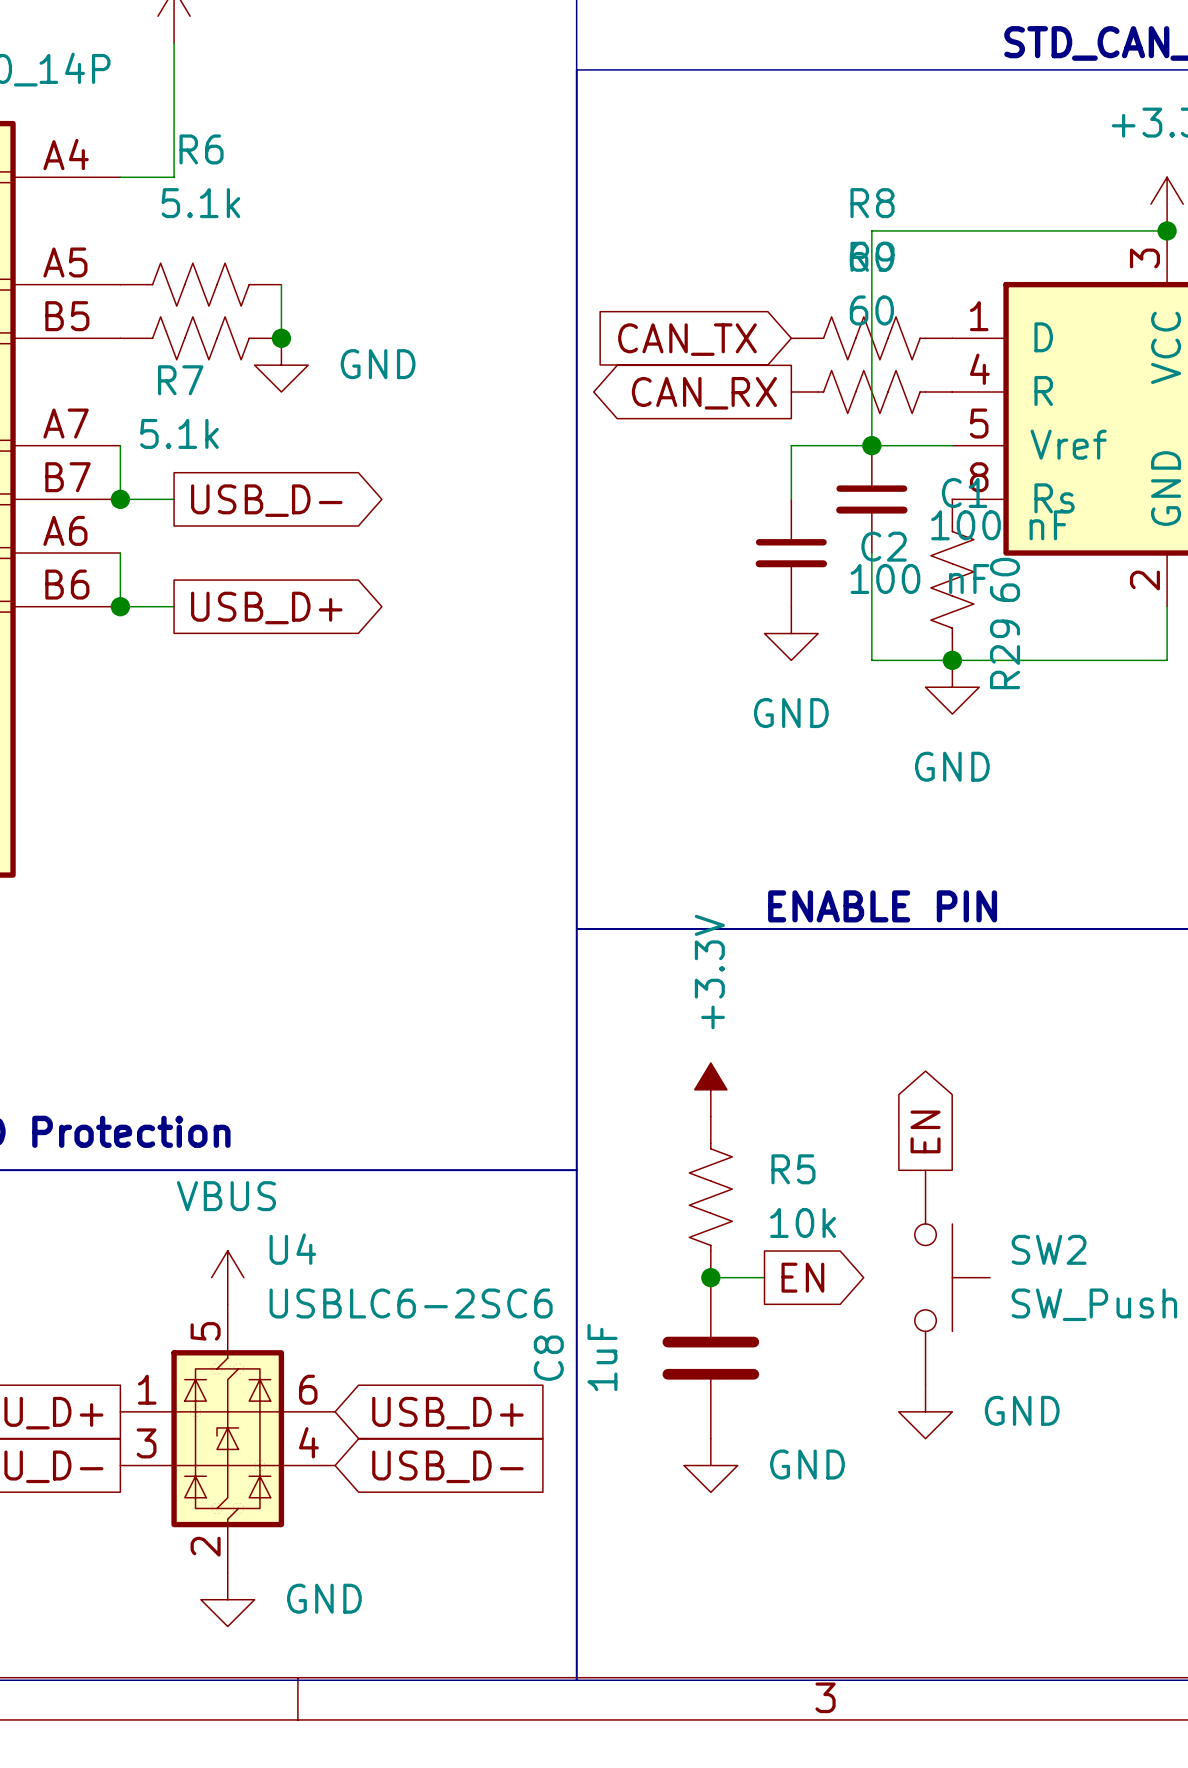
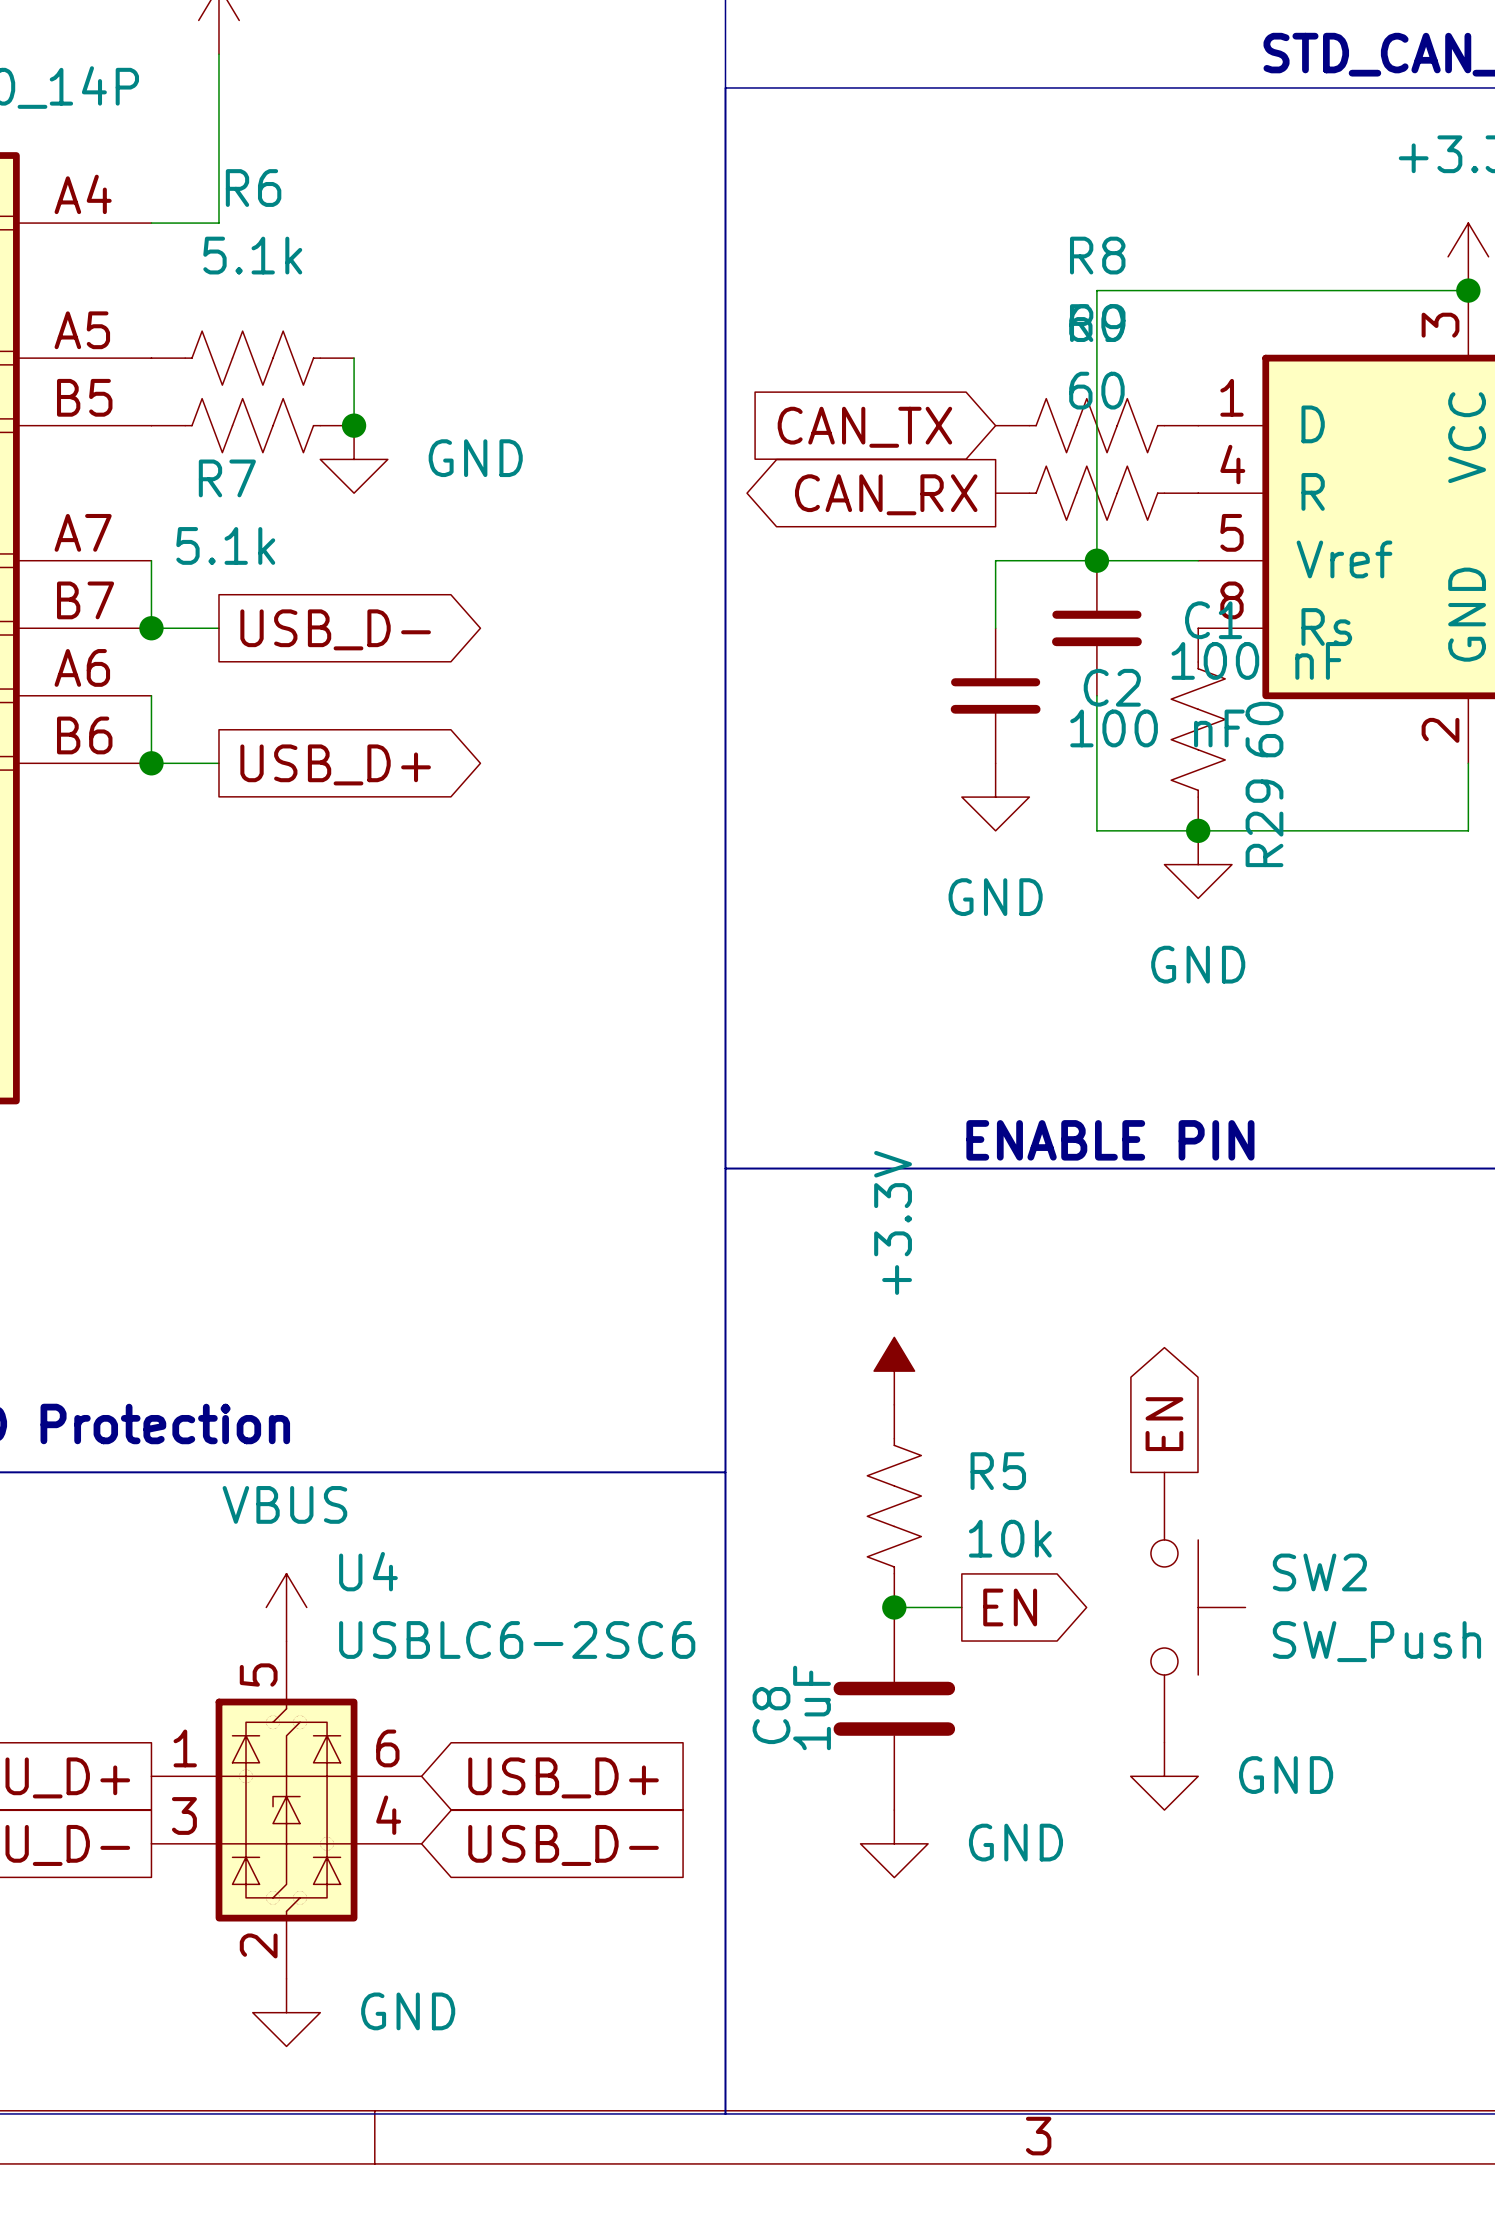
C8 value position: 1uF (602, 1357) -> 1uF (812, 1707)
C8 name position: C8 (548, 1358) -> C8 (771, 1715)

